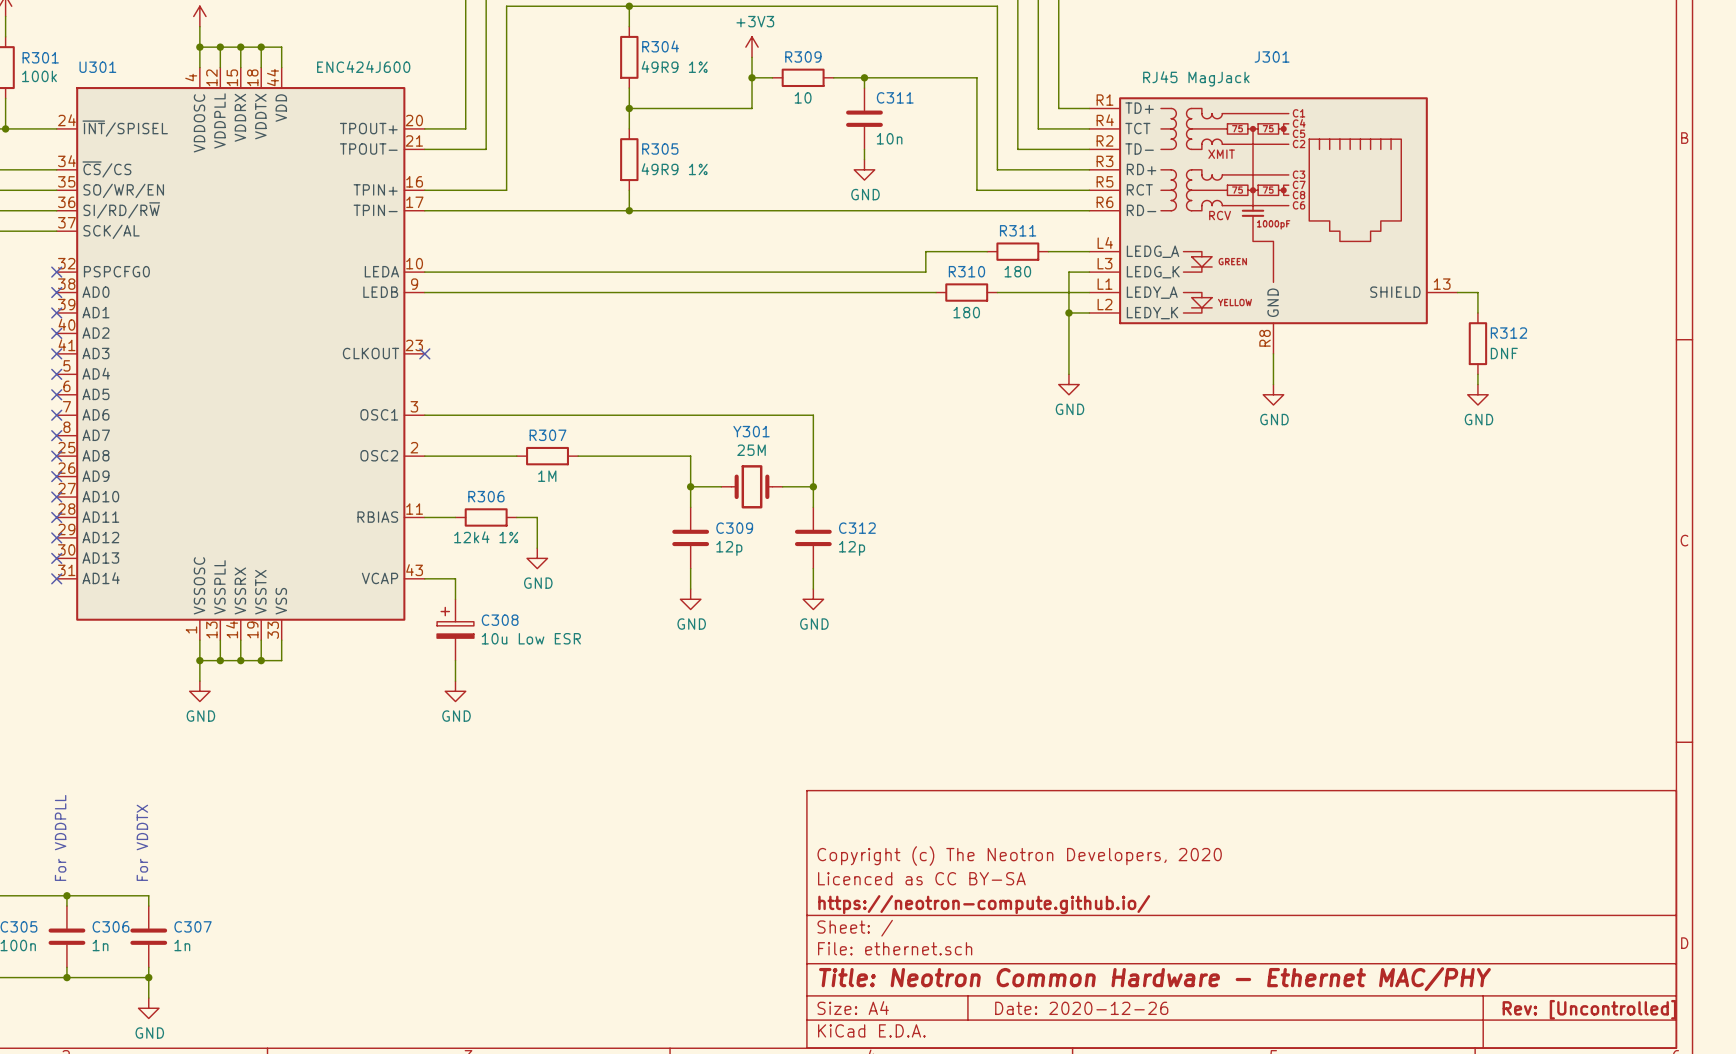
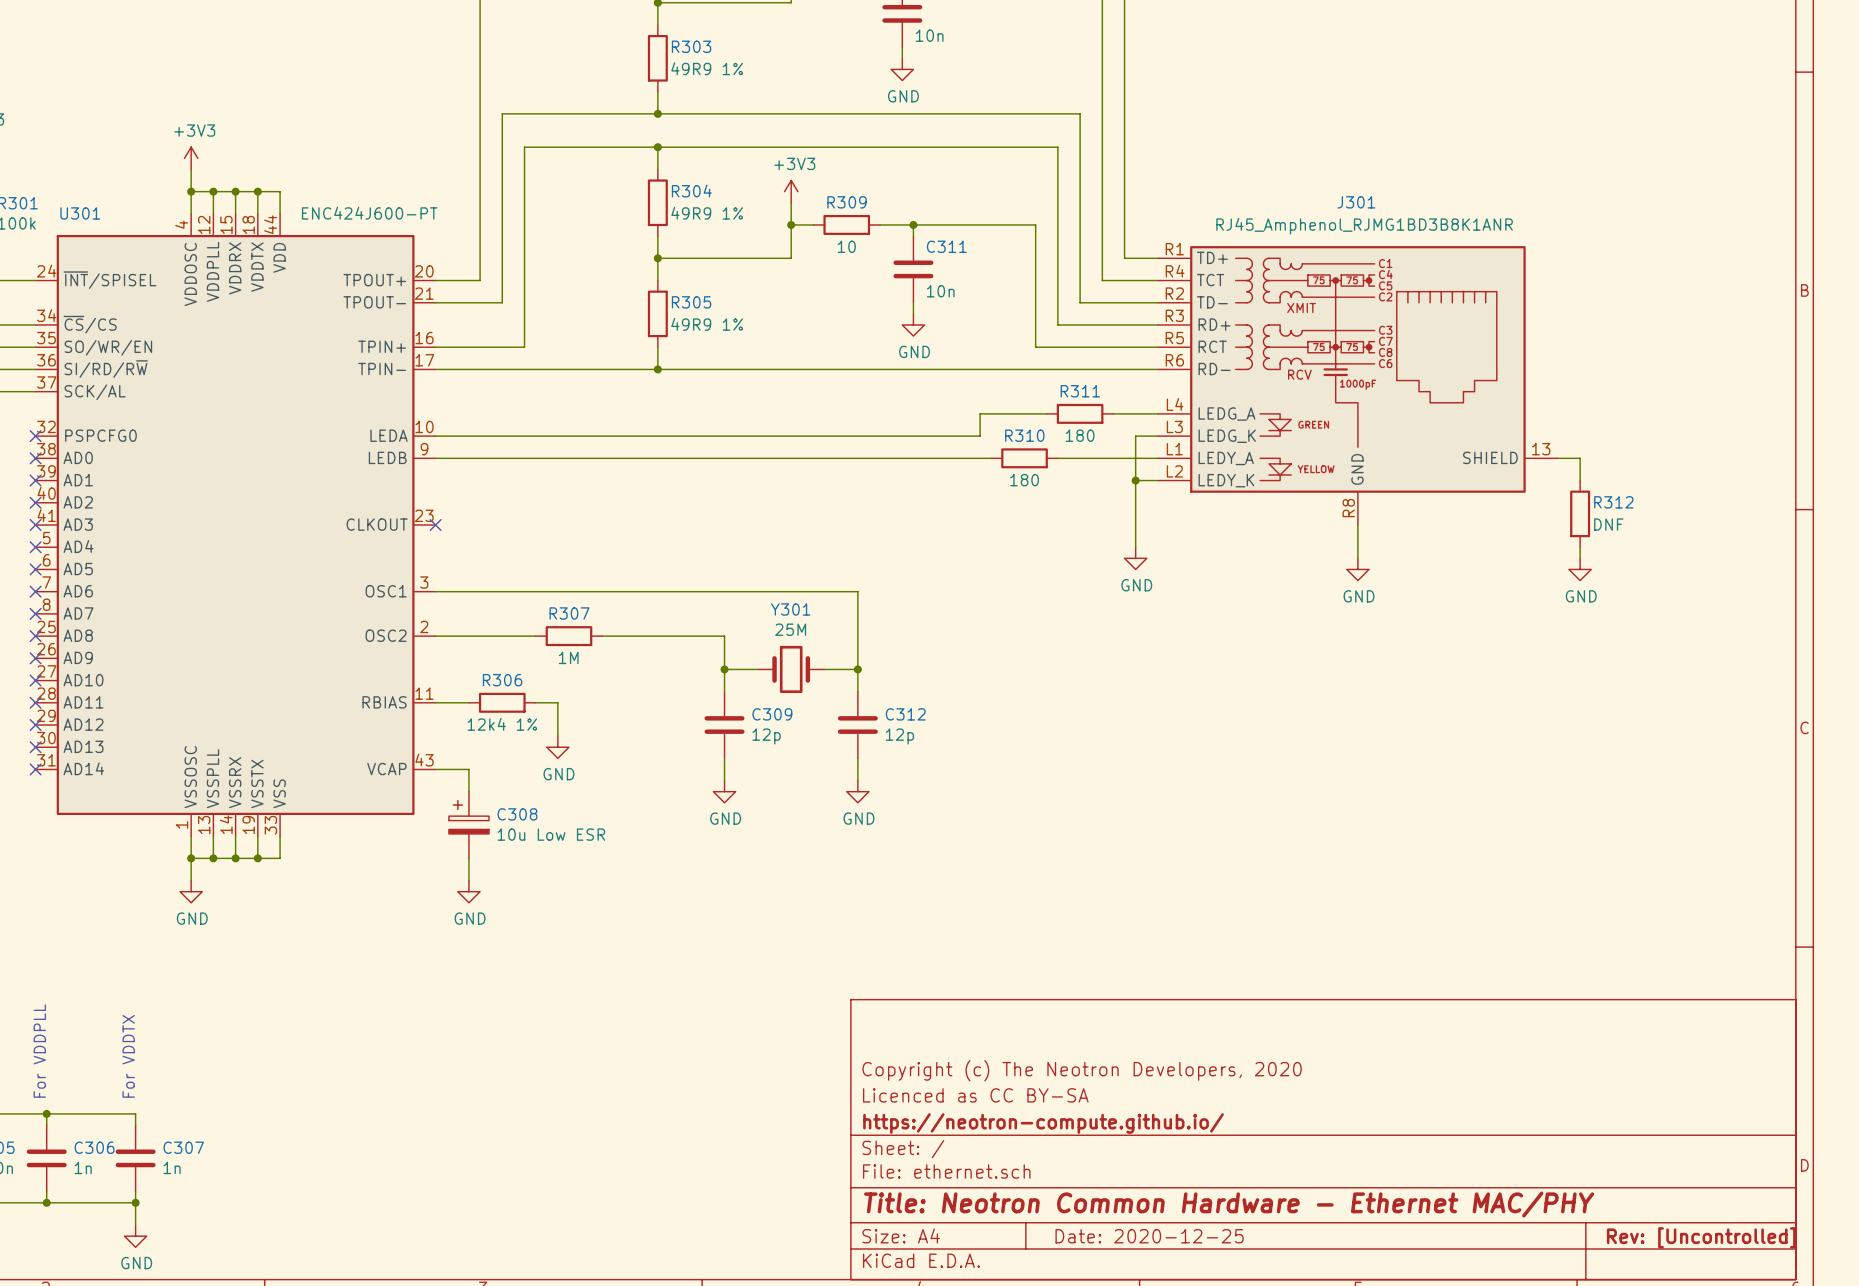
U301 value: ENC424J600 (363, 66) -> ENC424J600-PT (369, 213)
J301 value: RJ45 MagJack (1196, 78) -> RJ45_Amphenol_RJMG1BD3B8K1ANR (1364, 226)
title block: Date: 2020-12-26 (1081, 1008) -> Date: 2020-12-25 (1149, 1236)

